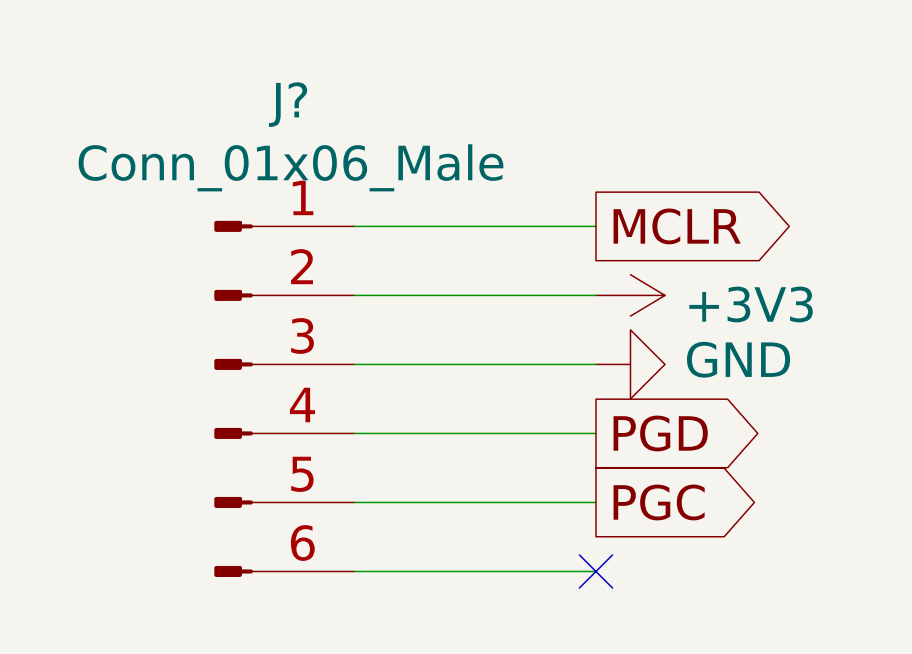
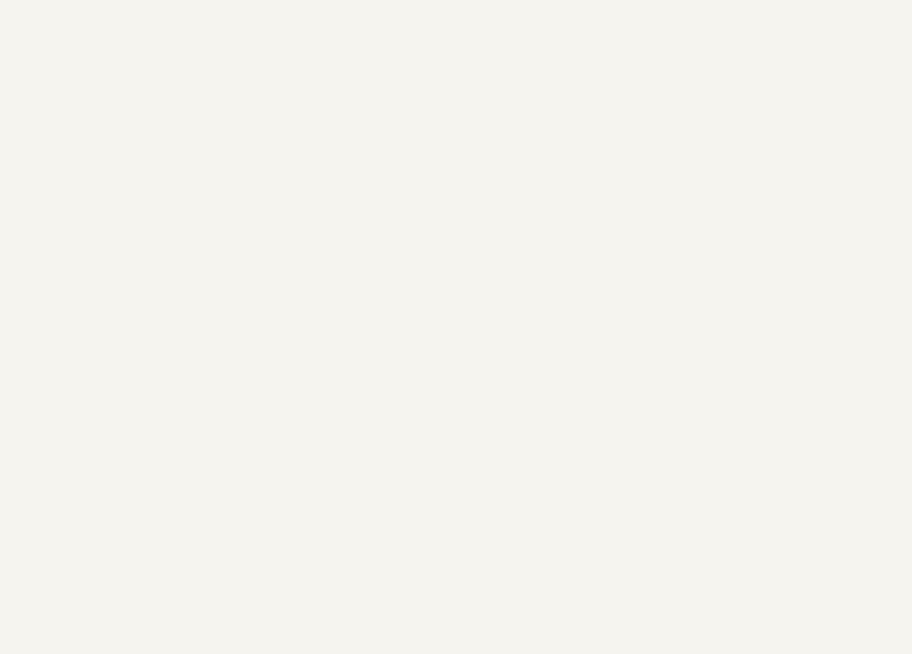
wire: (354, 226) (595, 226) -> none
global label: MCLR (677, 226) -> none
wire: (354, 295) (595, 295) -> none
power symbol: +3V3 (630, 295) -> none
wire: (354, 364) (595, 364) -> none
power symbol: GND (630, 364) -> none
J?: Conn_01x06_Male (284, 398) -> none
wire: (354, 433) (595, 433) -> none
global label: PGD (660, 433) -> none
wire: (354, 502) (595, 502) -> none
global label: PGC (659, 502) -> none
wire: (354, 571) (595, 571) -> none
no-connect mark: (595, 571) -> none

